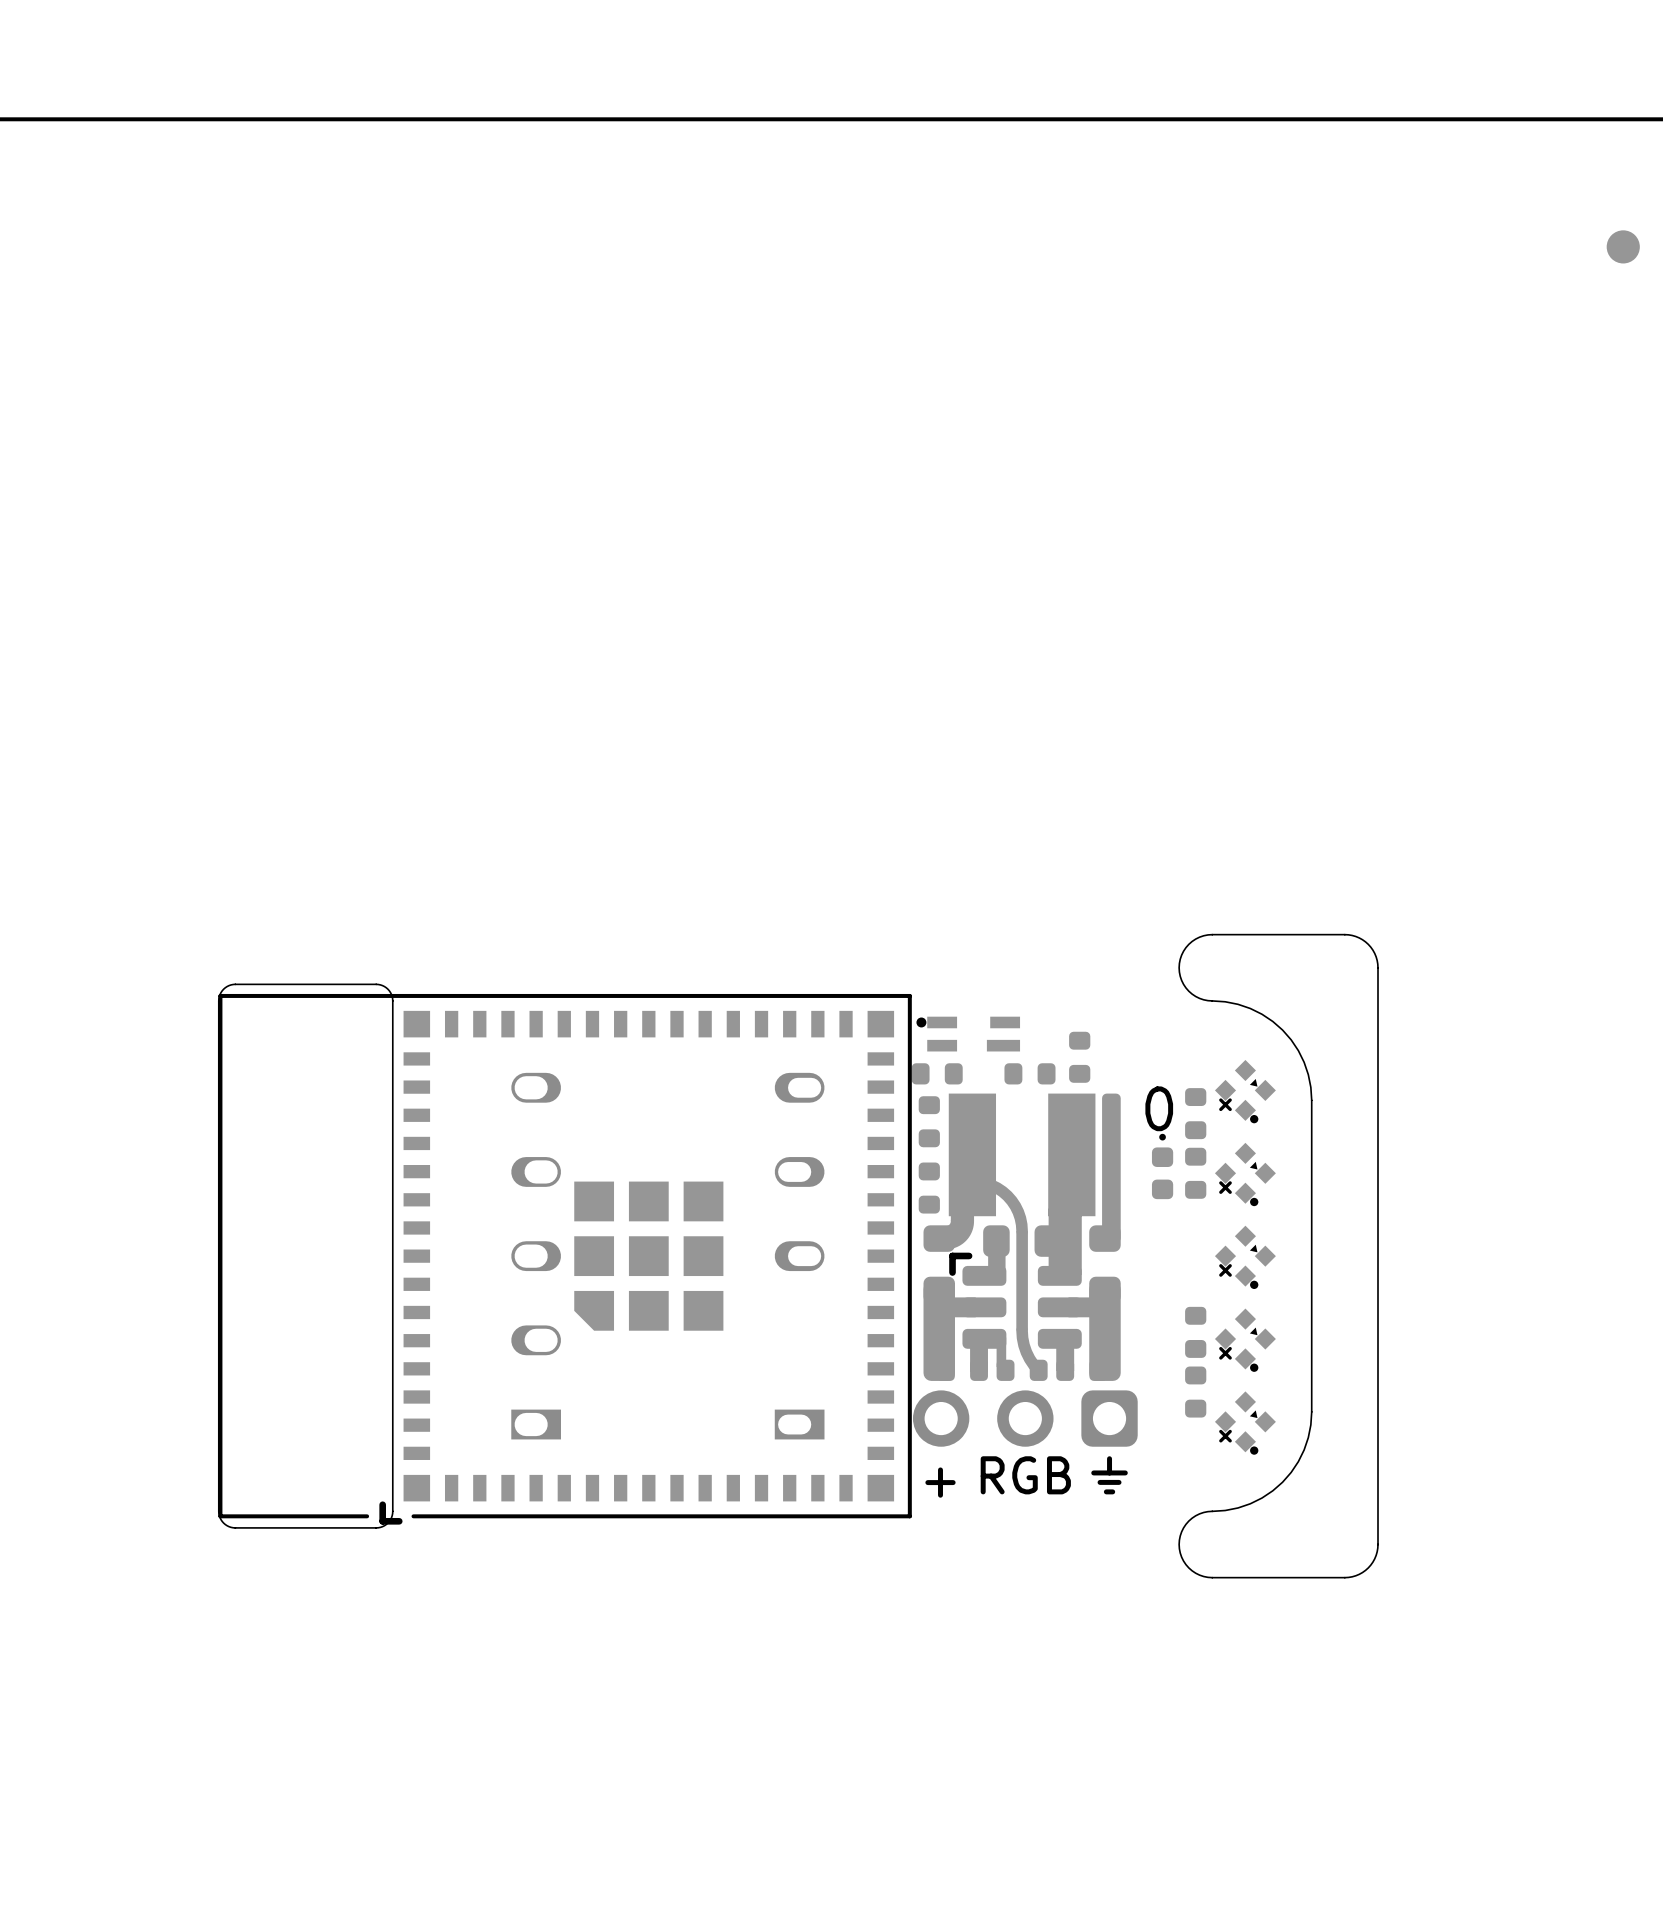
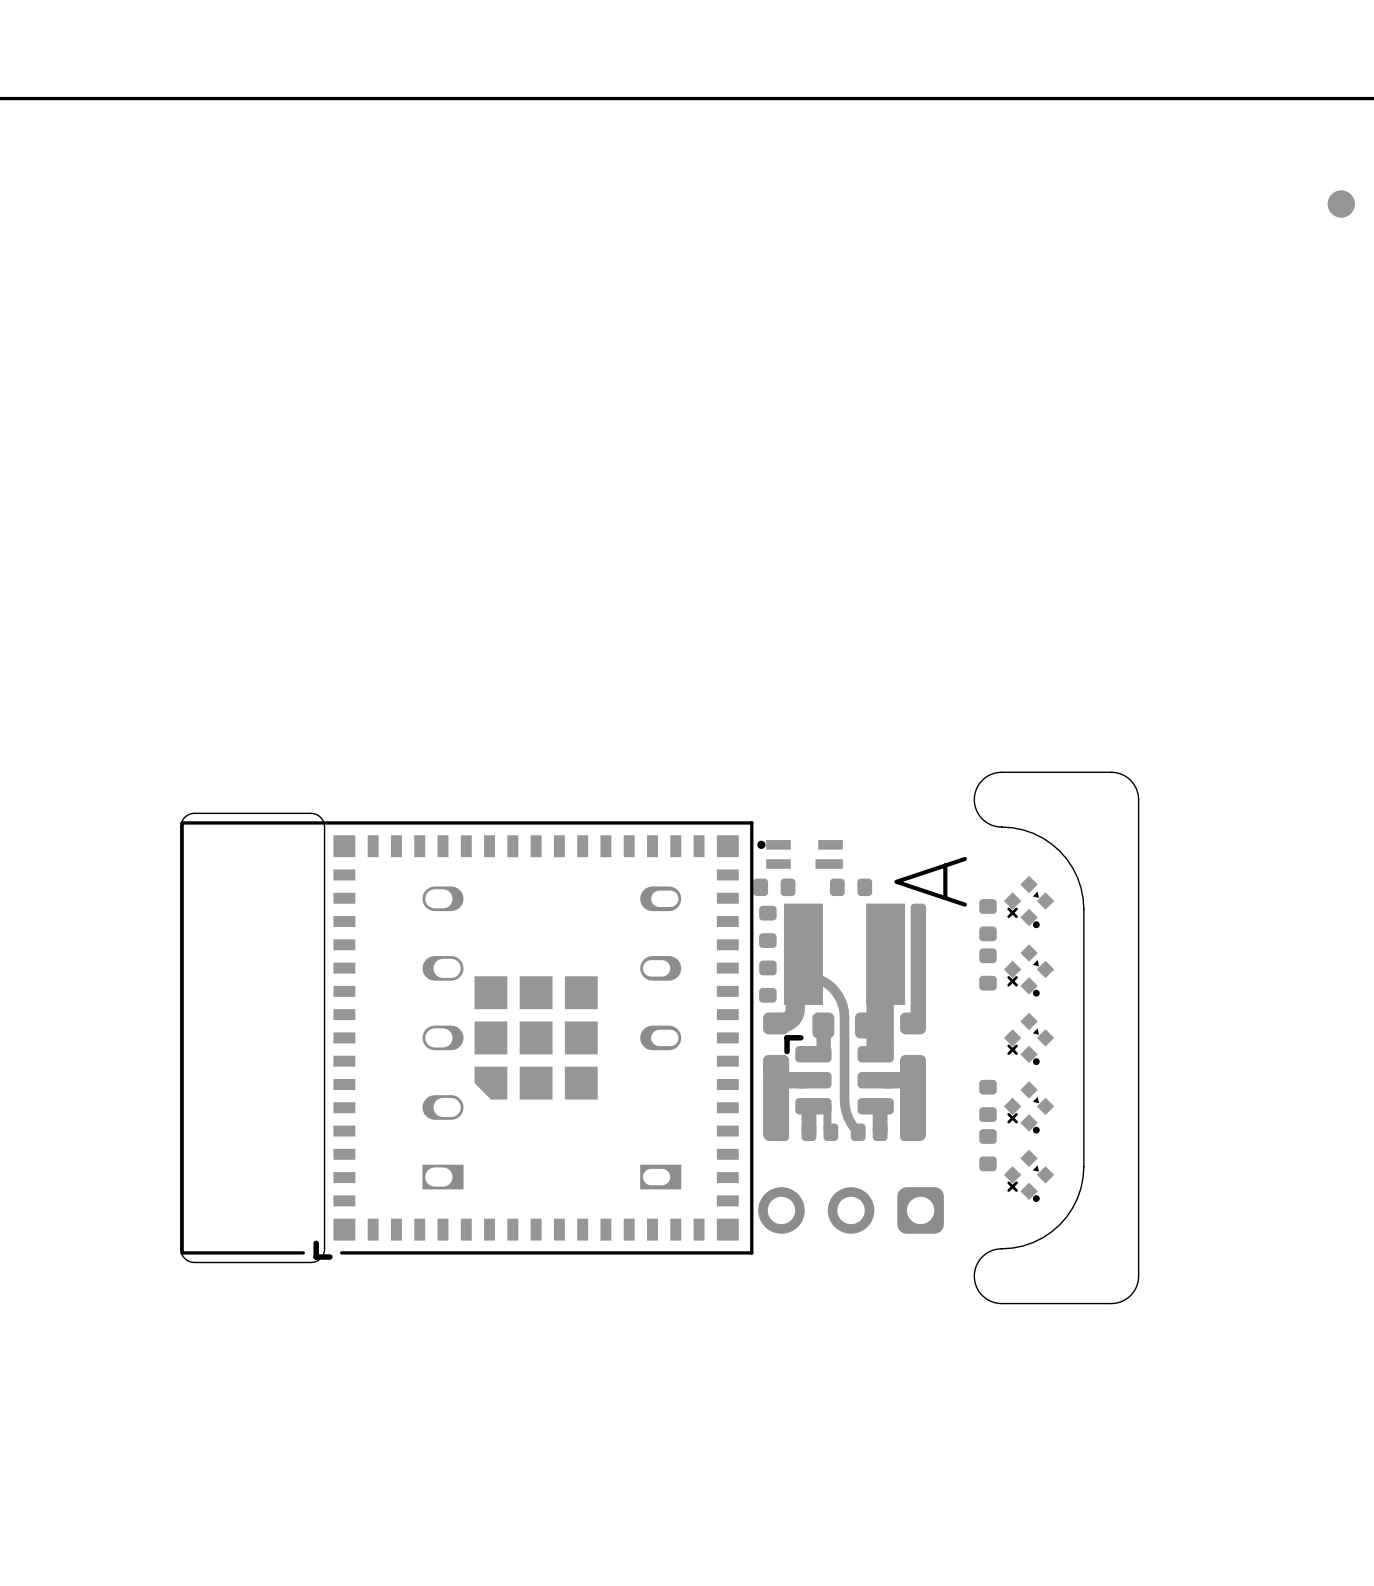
part: (1079, 1057) -> none
text: none -> A (930, 881)
text: 0 (1159, 1108) -> none
part: (1162, 1166) -> none
part position: (1025, 1418) -> (851, 1210)
text: RGB (1025, 1475) -> none
text: ⏚ (1109, 1475) -> none
text: + (940, 1482) -> none

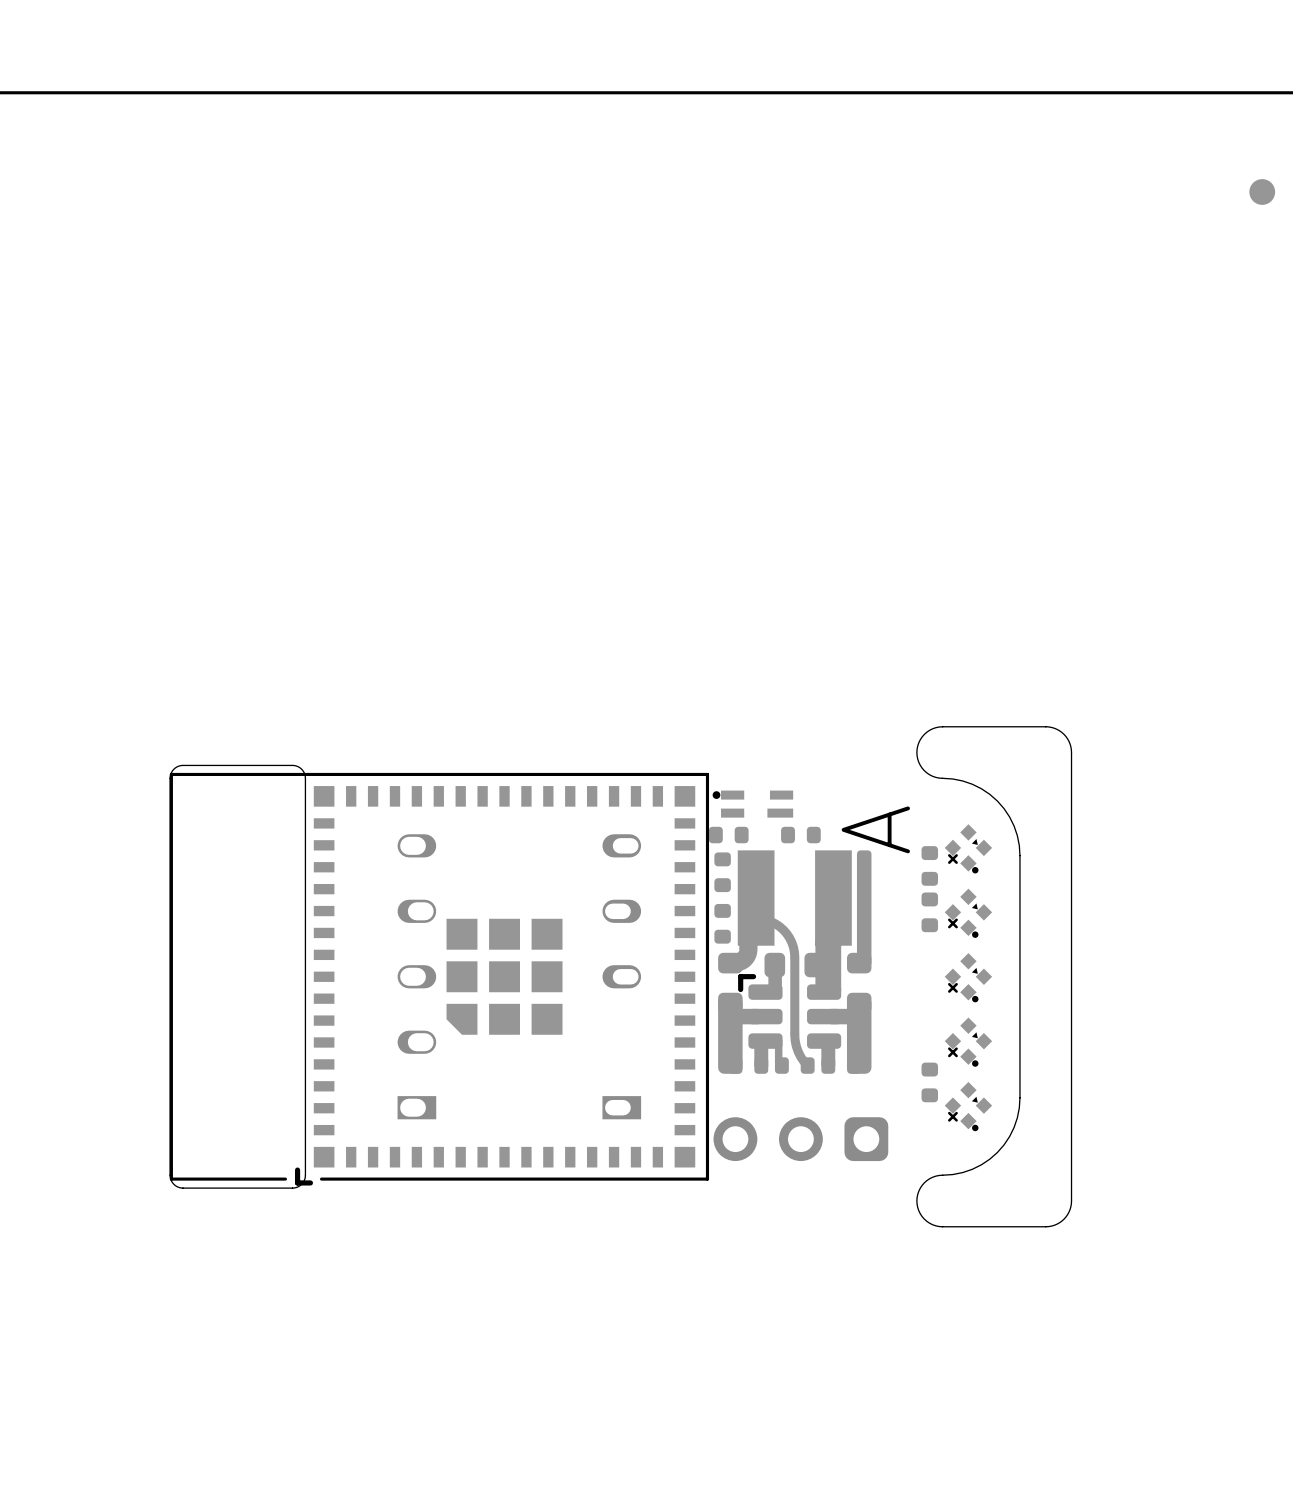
part: (987, 1100) -> none

